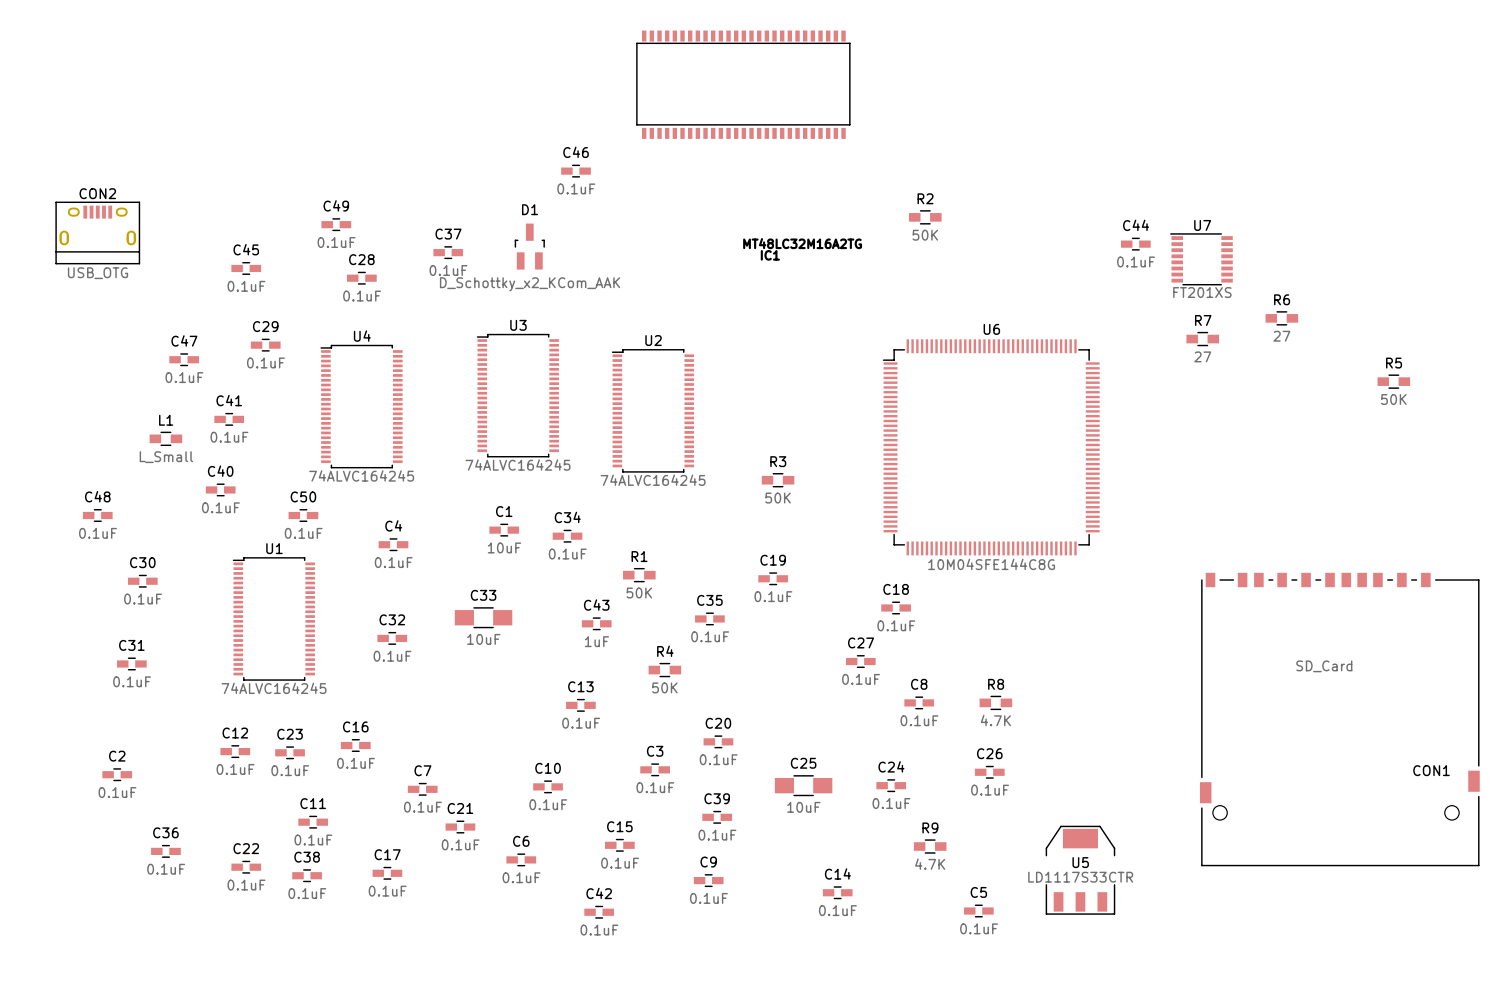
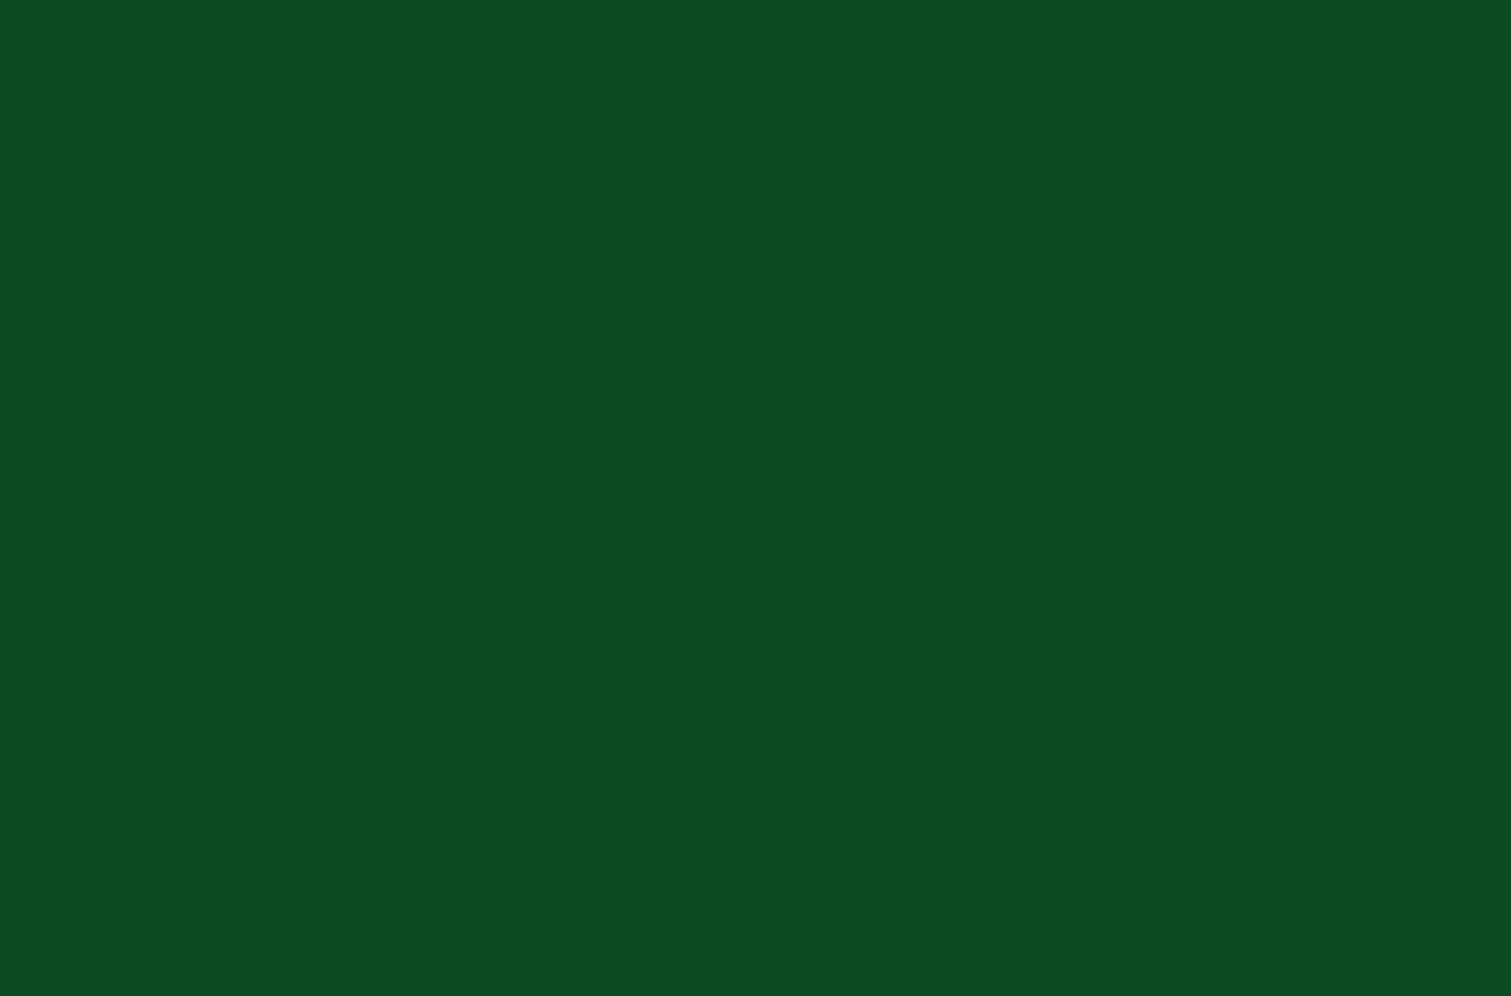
IC1: MT48LC32M16A2TG (743, 84) -> none
C46: 0.1uF (576, 171) -> none
R2: 50K (925, 217) -> none
C49: 0.1uF (336, 224) -> none
CON2: USB_OTG (97, 232) -> none
C44: 0.1uF (1135, 244) -> none
D1: D_Schottky_x2_KCom_AAK (529, 246) -> none
C37: 0.1uF (448, 252) -> none
U7: FT201XS (1201, 259) -> none
C45: 0.1uF (246, 268) -> none
C28: 0.1uF (361, 278) -> none
R6: 27 (1281, 318) -> none
R7: 27 (1202, 339) -> none
C29: 0.1uF (265, 345) -> none
C47: 0.1uF (184, 359) -> none
R5: 50K (1393, 381) -> none
U3: 74ALVC164245 (517, 395) -> none
U4: 74ALVC164245 (361, 406) -> none
U2: 74ALVC164245 (652, 410) -> none
C41: 0.1uF (229, 419) -> none
L1: L_Small (165, 438) -> none
U6: 10M04SFE144C8G (991, 447) -> none
R3: 50K (778, 480) -> none
C40: 0.1uF (220, 489) -> none
C48: 0.1uF (97, 515) -> none
C50: 0.1uF (303, 515) -> none
C1: 10uF (504, 530) -> none
C34: 0.1uF (567, 536) -> none
C4: 0.1uF (393, 544) -> none
R1: 50K (639, 575) -> none
C19: 0.1uF (773, 578) -> none
C30: 0.1uF (142, 581) -> none
C18: 0.1uF (896, 607) -> none
C33: 10uF (483, 617) -> none
U1: 74ALVC164245 (273, 618) -> none
C35: 0.1uF (709, 618) -> none
C43: 1uF (596, 623) -> none
C32: 0.1uF (392, 638) -> none
C27: 0.1uF (860, 661) -> none
C31: 0.1uF (131, 663) -> none
R4: 50K (664, 670) -> none
C8: 0.1uF (919, 702) -> none
R8: 4.7K (995, 702) -> none
C13: 0.1uF (580, 705) -> none
CON1: SD_Card (1339, 719) -> none
C20: 0.1uF (718, 741) -> none
C16: 0.1uF (355, 745) -> none
C12: 0.1uF (235, 751) -> none
C23: 0.1uF (290, 752) -> none
C3: 0.1uF (655, 769) -> none
C26: 0.1uF (989, 772) -> none
C2: 0.1uF (117, 774) -> none
C25: 10uF (803, 785) -> none
C24: 0.1uF (891, 785) -> none
C10: 0.1uF (548, 786) -> none
C7: 0.1uF (422, 789) -> none
C39: 0.1uF (717, 817) -> none
C11: 0.1uF (313, 822) -> none
C21: 0.1uF (460, 827) -> none
C15: 0.1uF (619, 845) -> none
R9: 4.7K (930, 846) -> none
C36: 0.1uF (165, 851) -> none
C6: 0.1uF (521, 859) -> none
C22: 0.1uF (246, 867) -> none
U5: LD1117S33CTR (1080, 870) -> none
C17: 0.1uF (387, 873) -> none
C38: 0.1uF (307, 875) -> none
C9: 0.1uF (708, 880) -> none
C14: 0.1uF (837, 892) -> none
C5: 0.1uF (978, 911) -> none
C42: 0.1uF (599, 912) -> none

